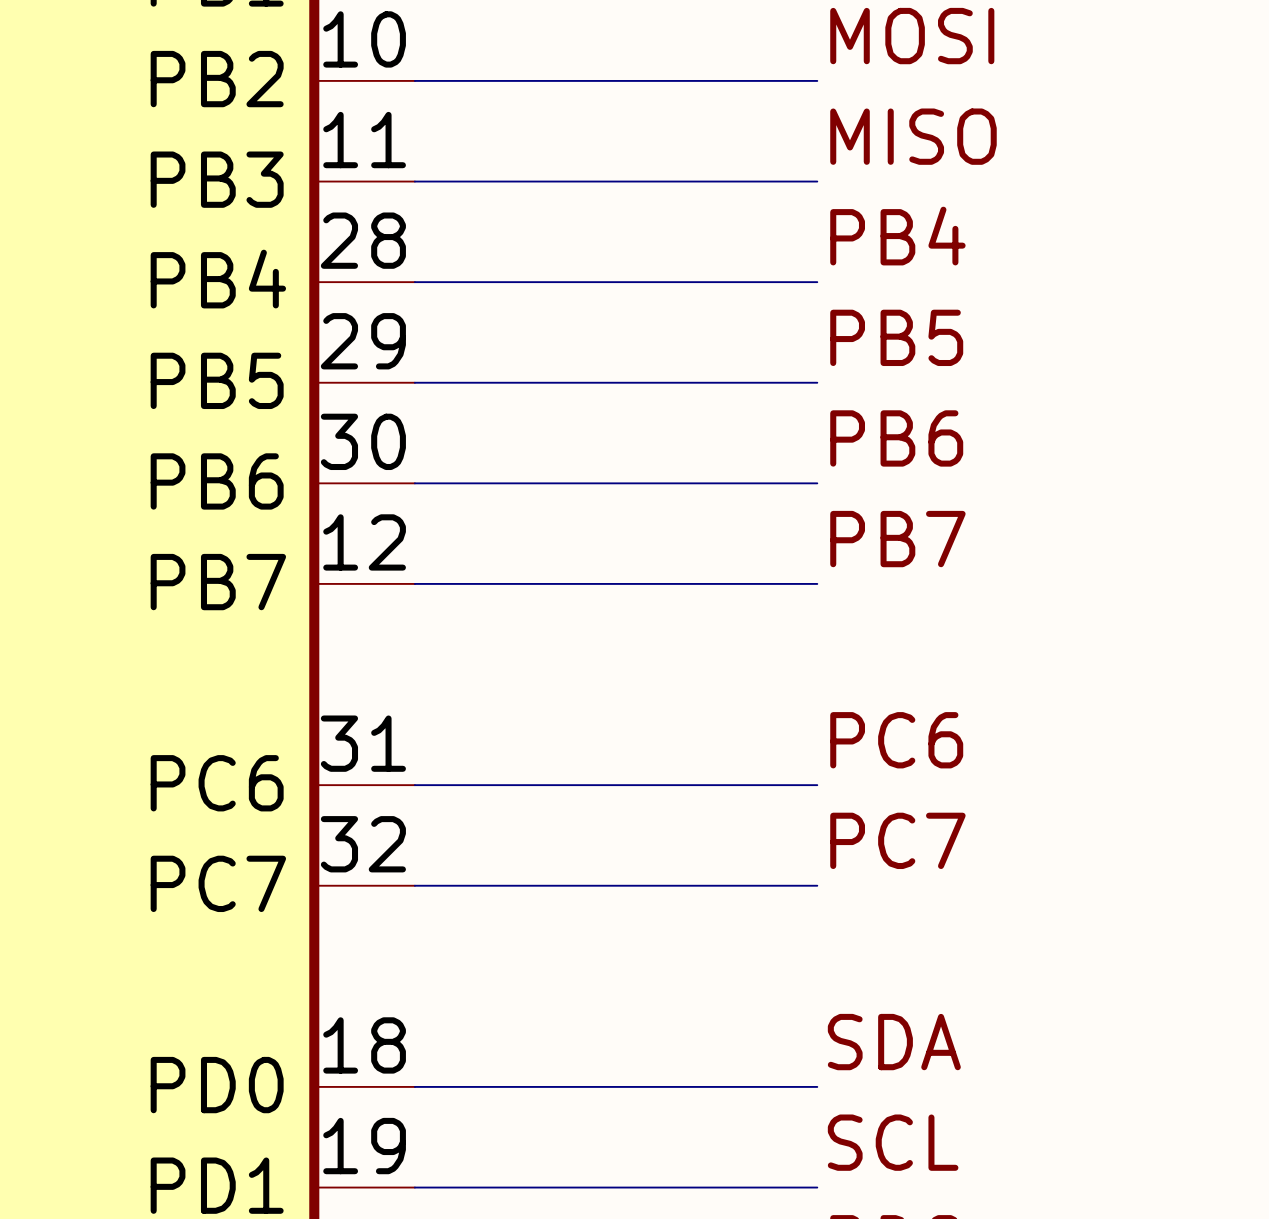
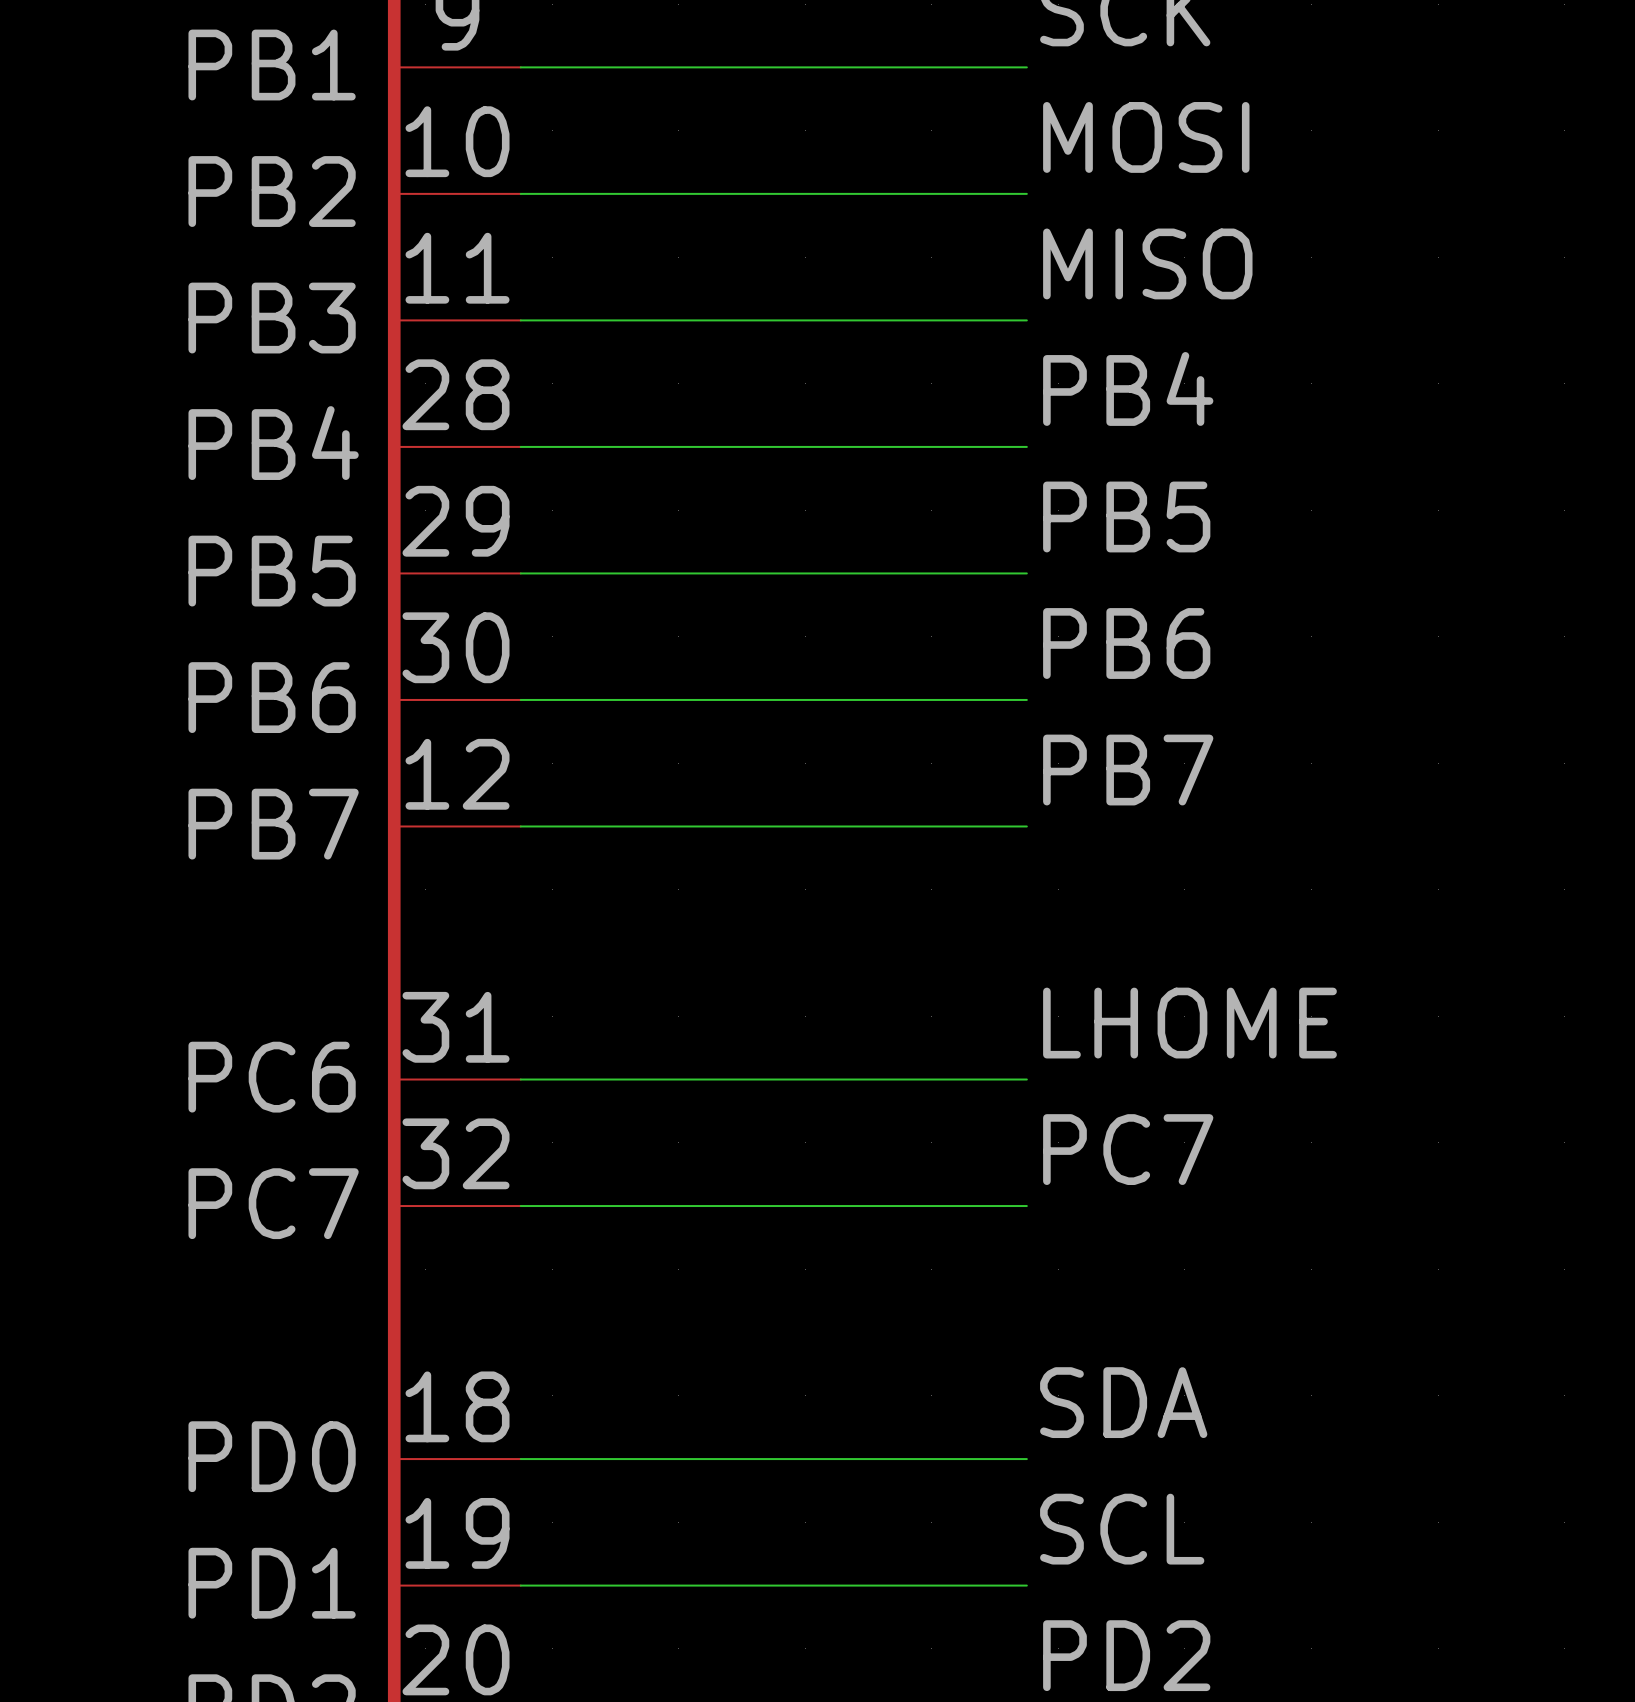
label: PC6 (896, 740) -> LHOME (1189, 1023)

